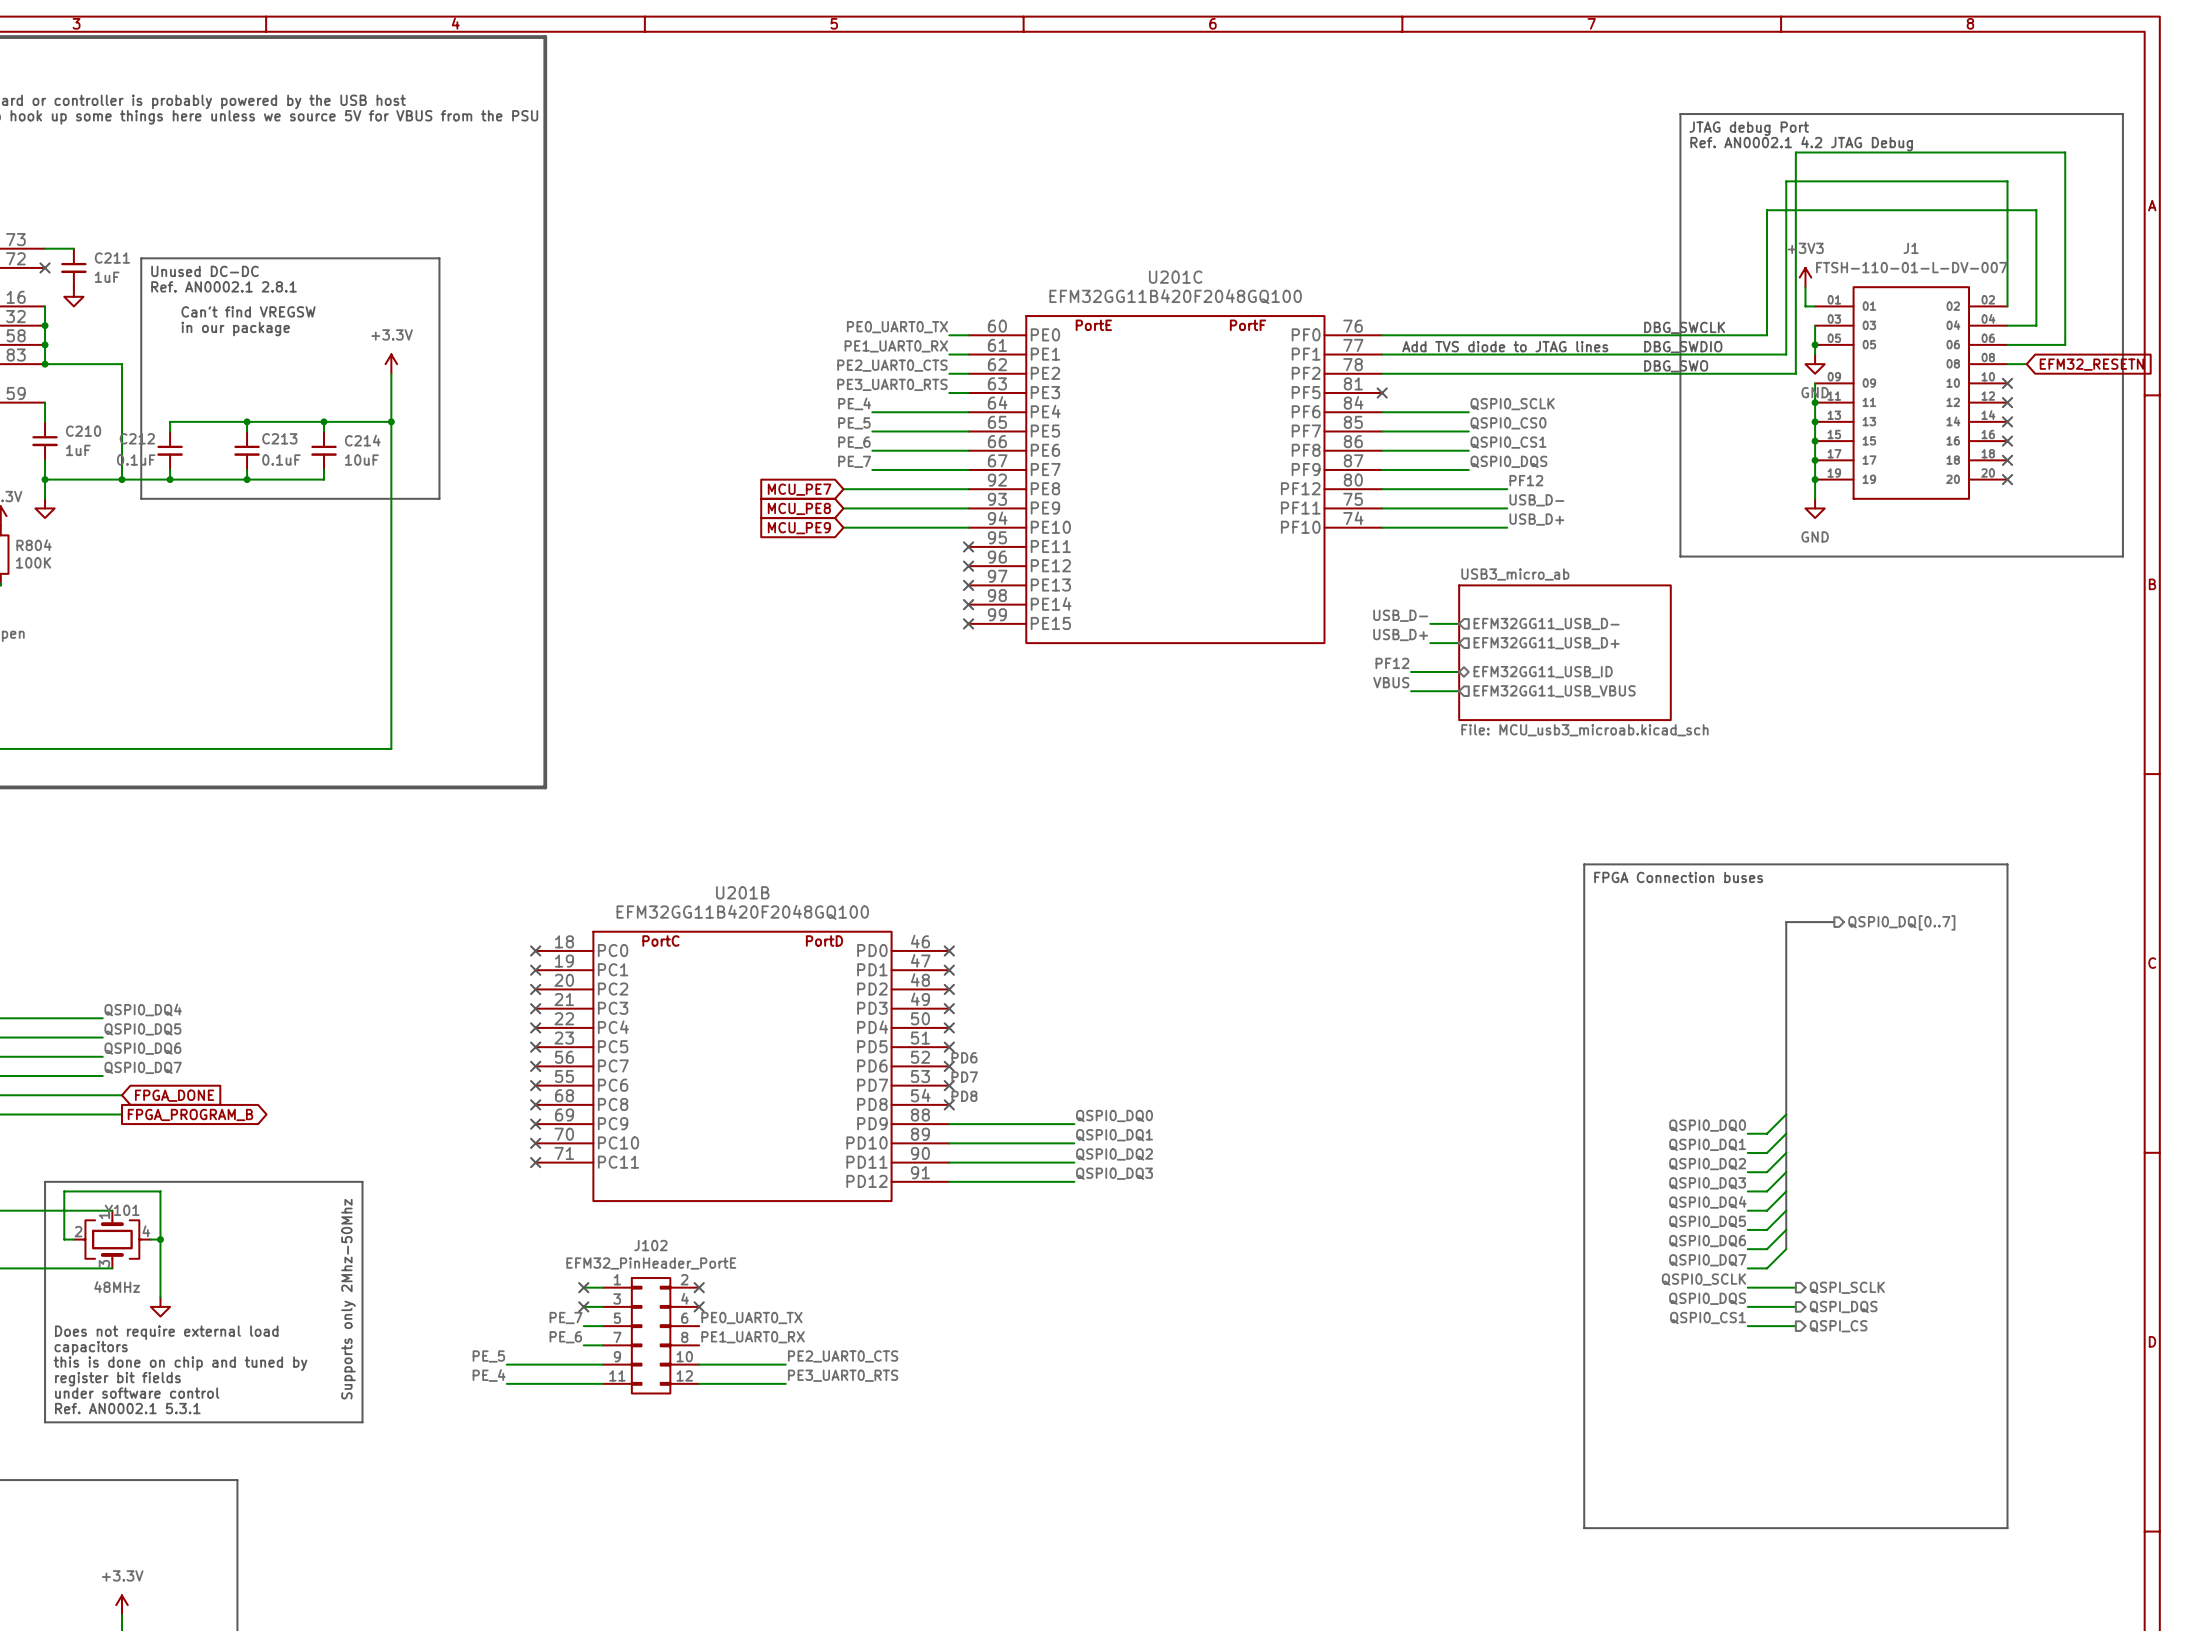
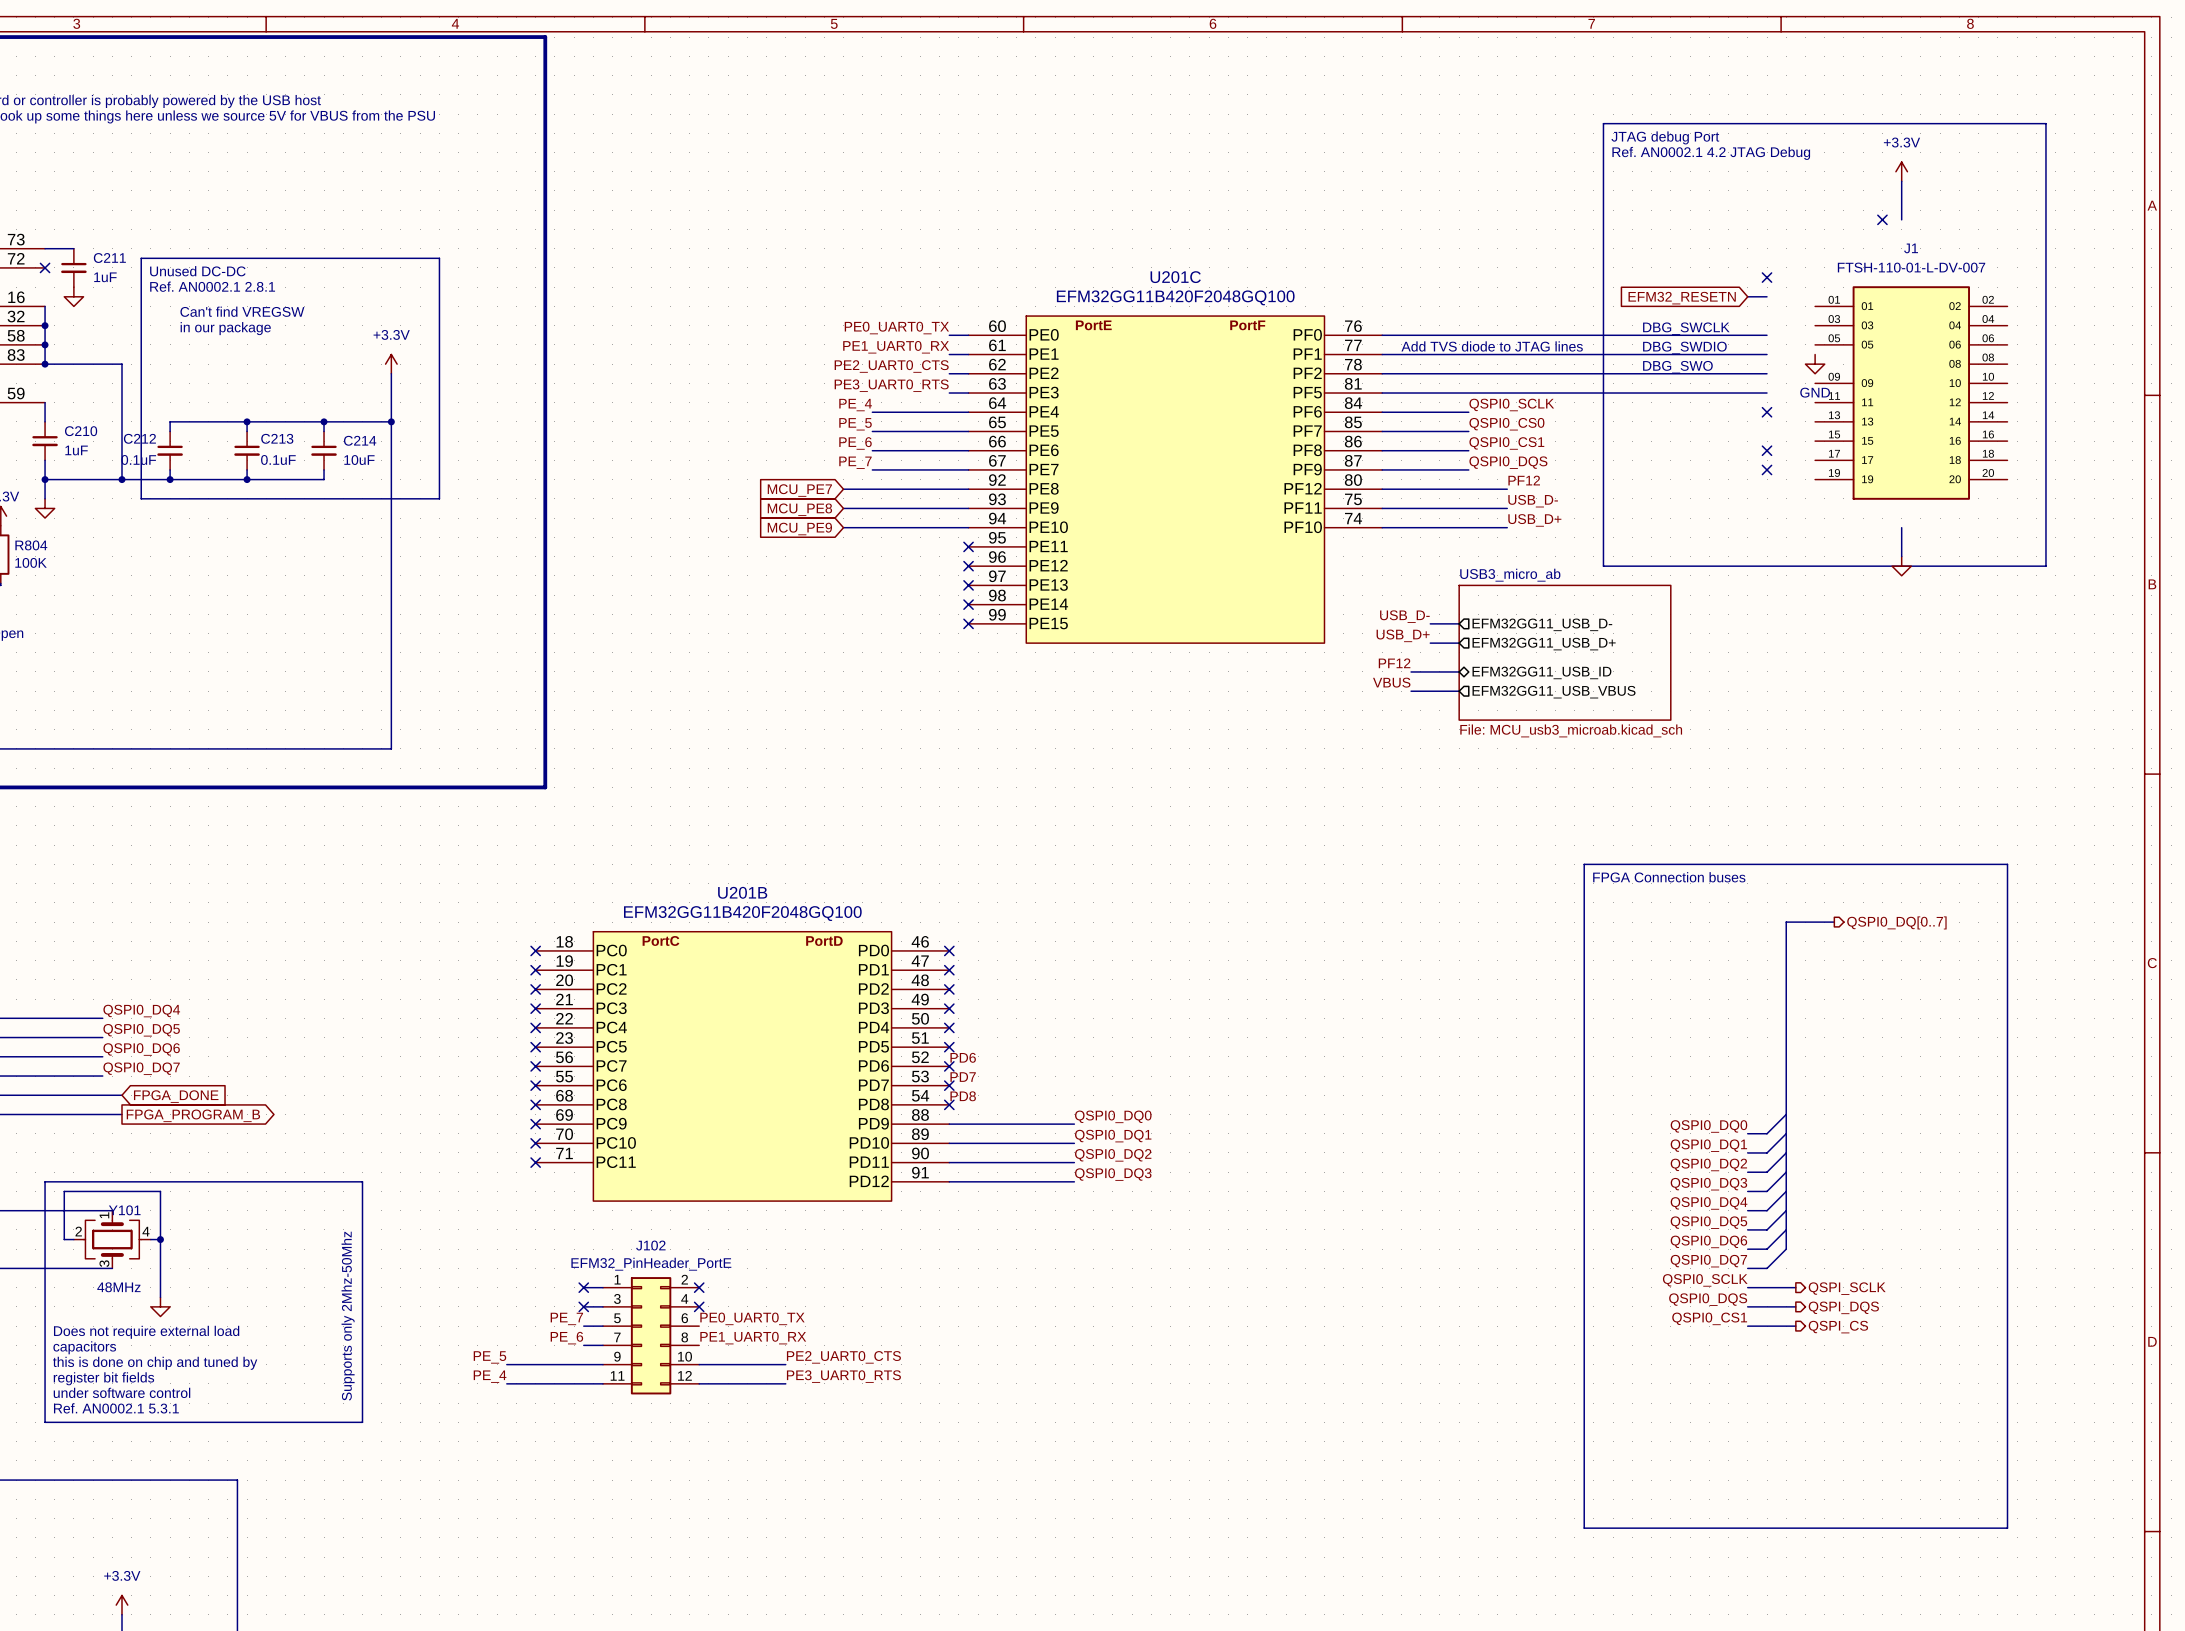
line: (1680, 114) (2122, 114) (2122, 556) (1680, 556) (1680, 114) -> (1603, 123) (2045, 123) (2045, 566) (1603, 566) (1603, 123)
text position: JTAG debug Port (1749, 128) -> JTAG debug Port (1665, 137)
text position: Ref. AN0002.1 4.2 JTAG Debug (1801, 143) -> Ref. AN0002.1 4.2 JTAG Debug (1711, 153)
power symbol: none -> +3.3V (1901, 171)
wire: none -> (1901, 181) (1901, 219)
no-connect mark: none -> (1882, 219)
no-connect mark: none -> (1767, 277)
power symbol: +3V3 (1805, 277) -> none
wire: (1805, 287) (1805, 306) (1815, 306) -> none
wire: none -> (1747, 296) (1767, 296)
global label: none -> EFM32_RESETN (1682, 298)
wire: (2007, 306) (2007, 181) (1786, 181) (1786, 354) (1767, 354) -> none
wire: (1815, 325) (1815, 354) -> none
wire: (2007, 325) (2036, 325) (2036, 210) (1767, 210) (1767, 335) -> none
junction: (1815, 344) -> none
wire: (2007, 344) (2065, 344) (2065, 152) (1795, 152) (1795, 373) (1767, 373) -> none
wire: (2007, 364) (2026, 364) -> none
global label: EFM32_RESETN (2091, 364) -> none
wire: (1815, 383) (1815, 498) -> none
no-connect mark: (2007, 383) -> none
wire: none -> (1382, 393) (1767, 393)
no-connect mark: (1382, 393) -> none
junction: (1815, 402) -> none
no-connect mark: (2007, 402) -> none
no-connect mark: none -> (1767, 412)
junction: (1815, 421) -> none
no-connect mark: (2007, 421) -> none
junction: (1815, 441) -> none
no-connect mark: (2007, 441) -> none
no-connect mark: none -> (1767, 450)
junction: (1815, 460) -> none
no-connect mark: (2007, 460) -> none
no-connect mark: none -> (1767, 469)
junction: (1815, 479) -> none
no-connect mark: (2007, 479) -> none
power symbol: GND (1815, 508) -> none
wire: none -> (1901, 527) (1901, 556)
power symbol: none -> (1901, 566)

